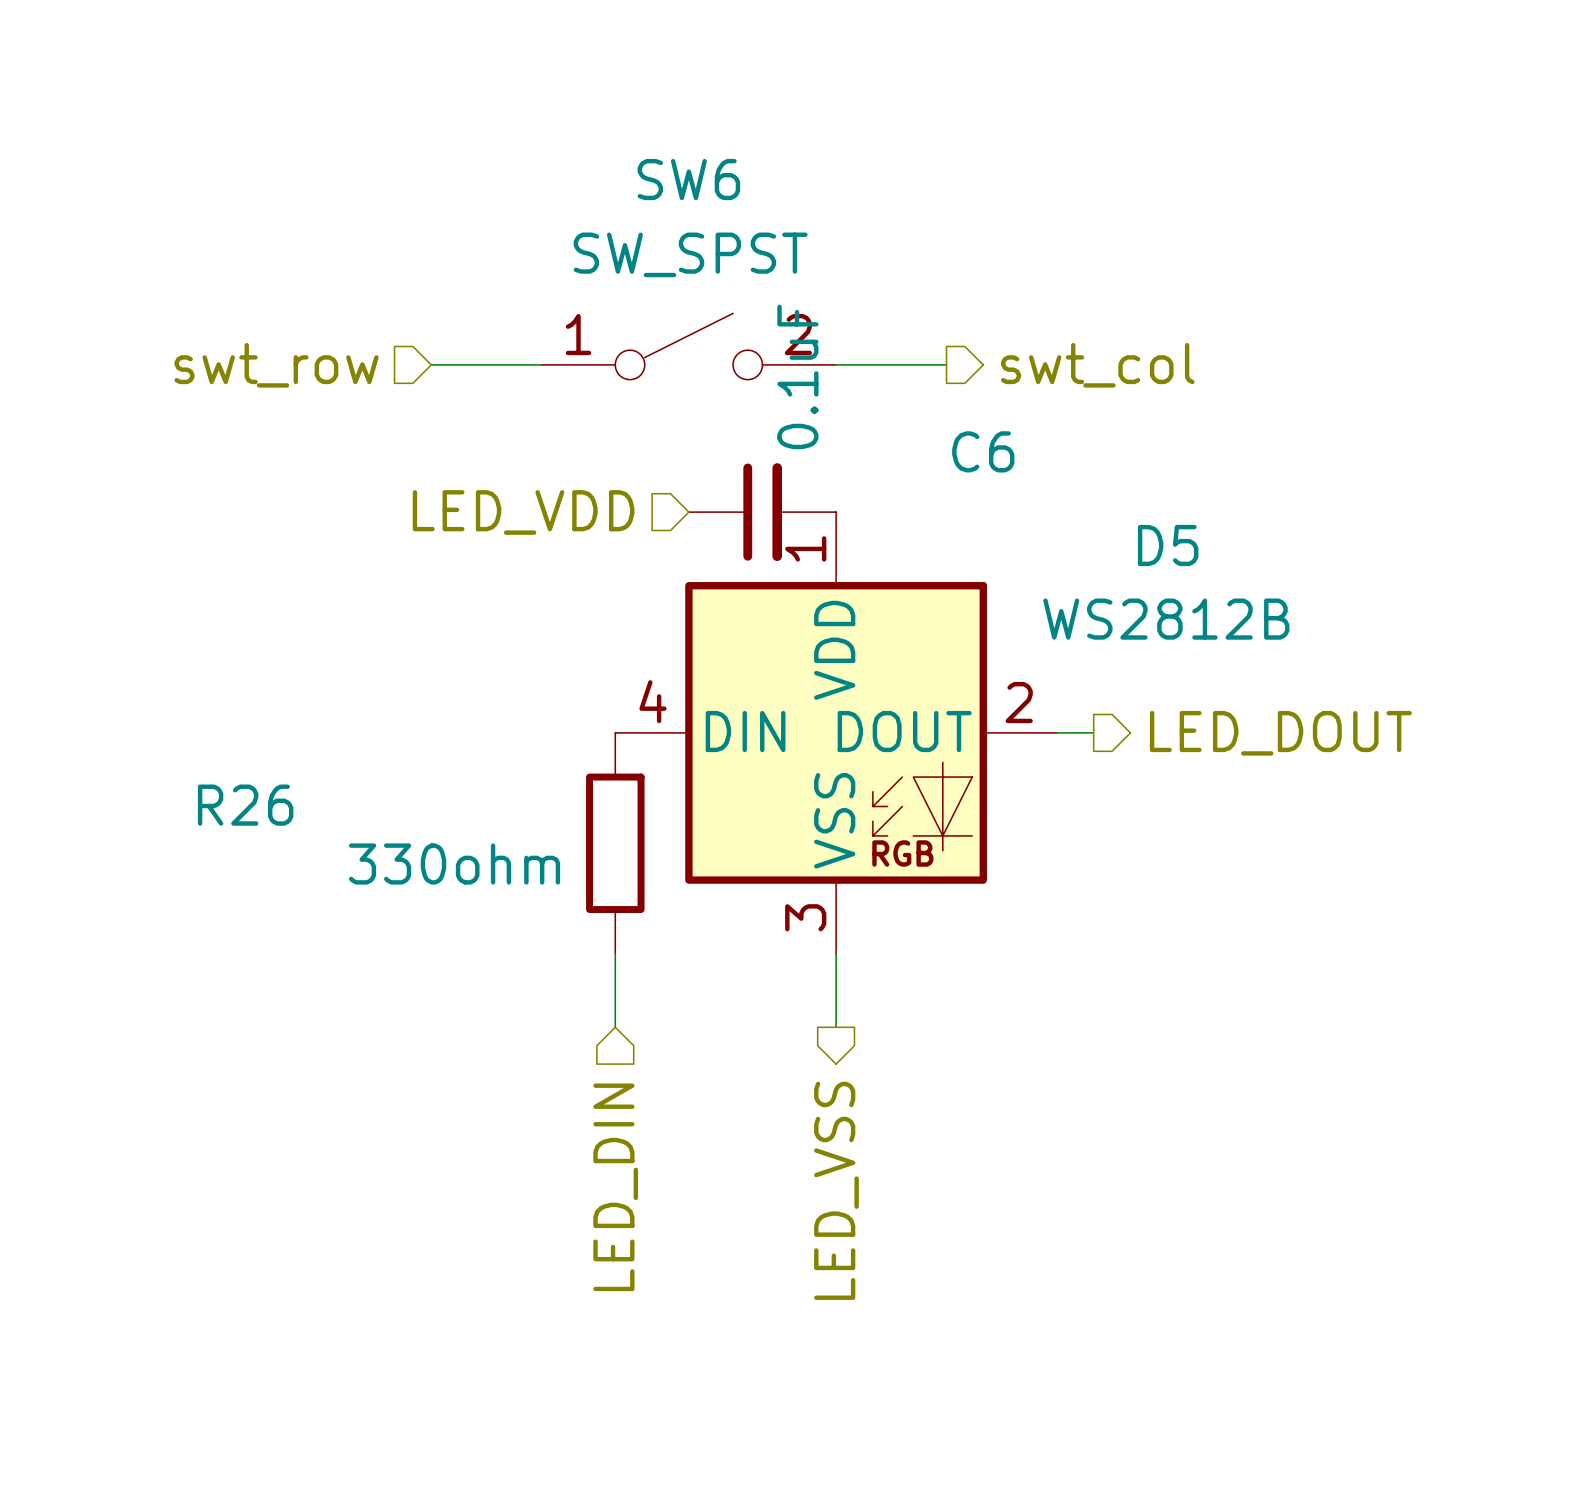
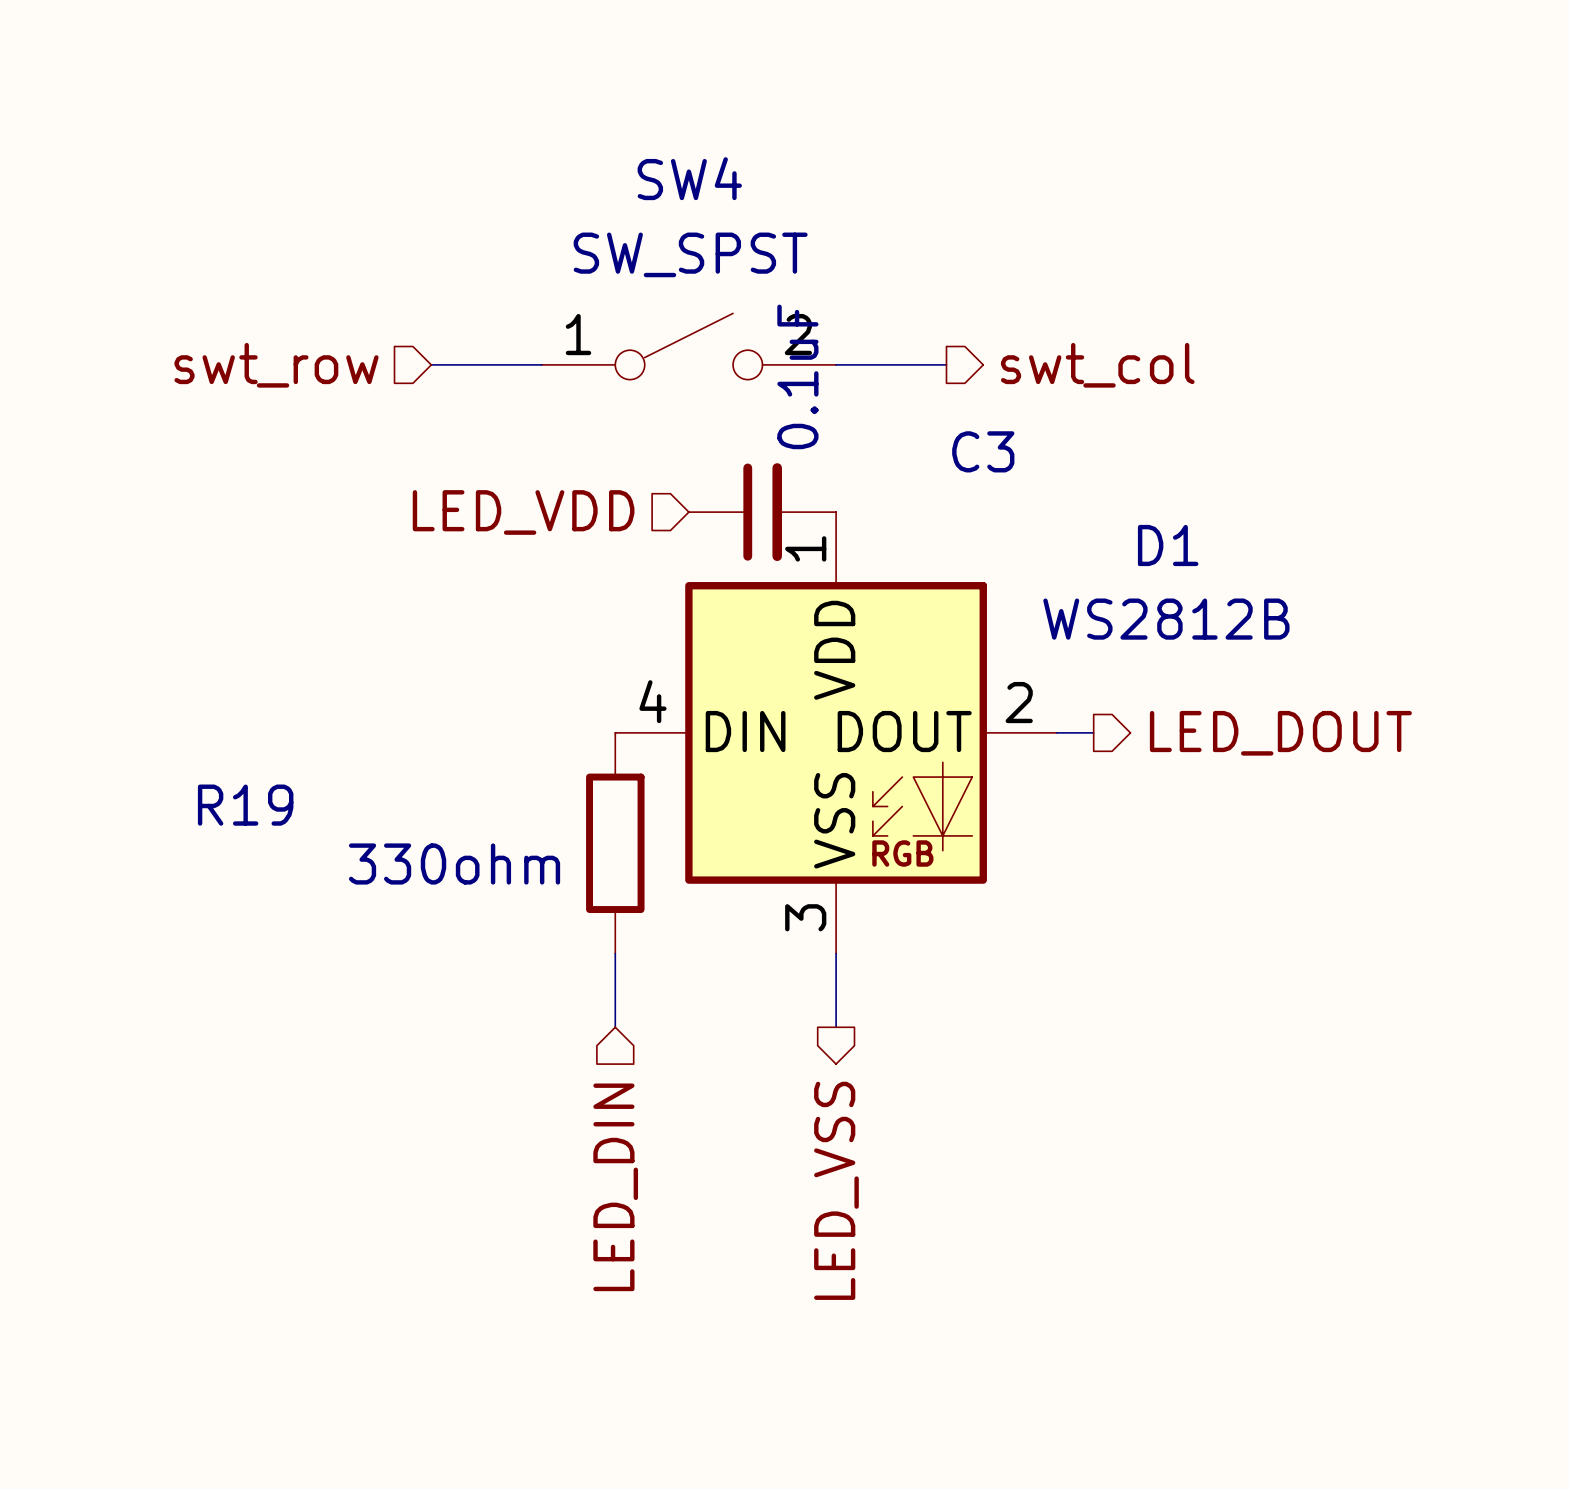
SW6 name: SW6 (688, 179) -> SW4 (689, 178)
C6 name: C6 (983, 451) -> C3 (983, 451)
D5 name: D5 (1168, 545) -> D1 (1168, 545)
R26 name: R26 (245, 805) -> R19 (245, 805)

